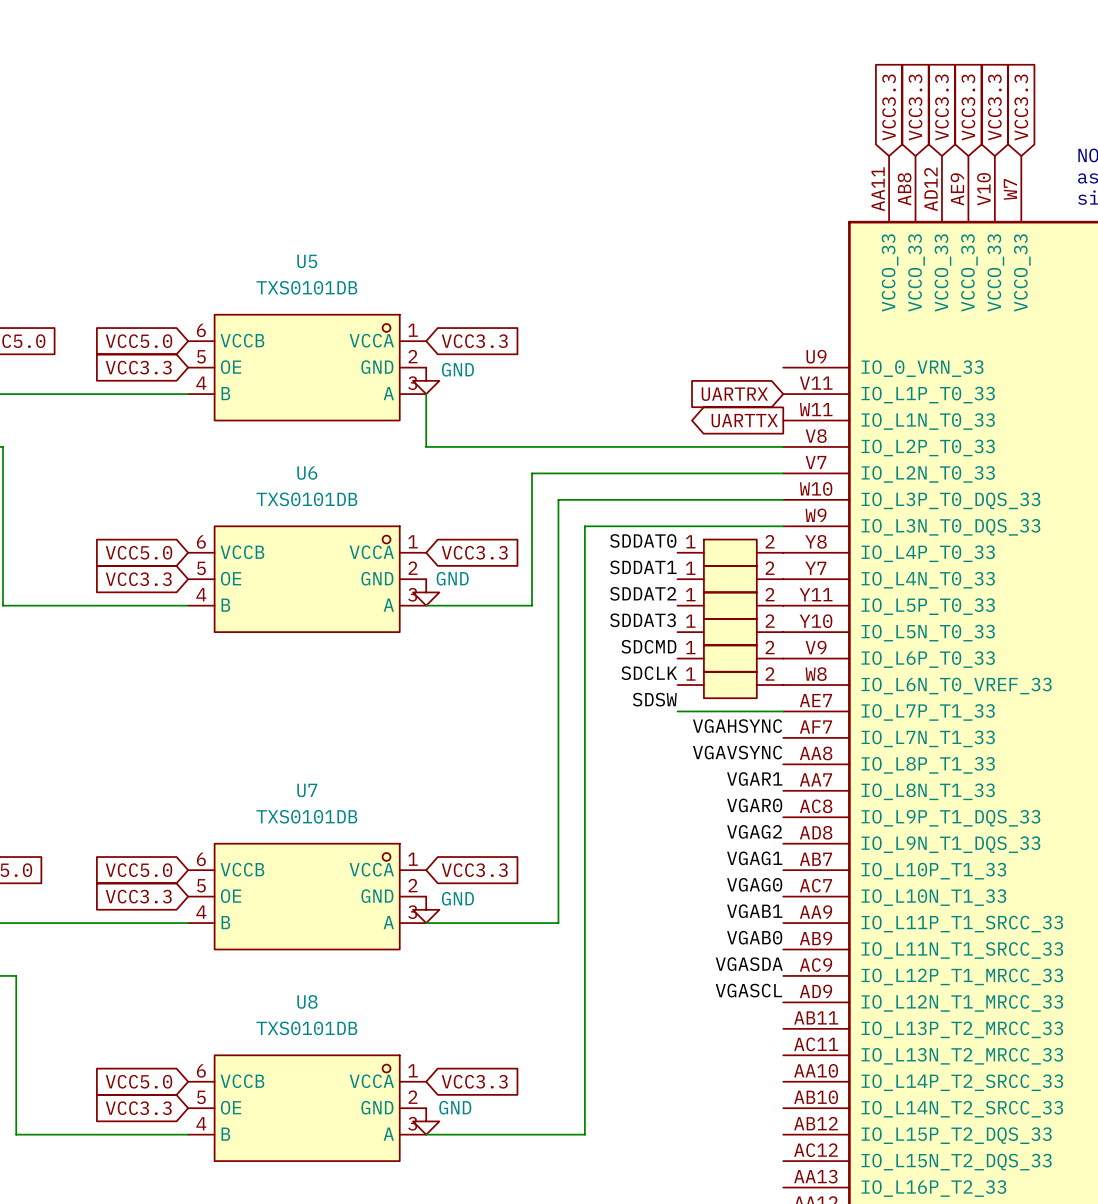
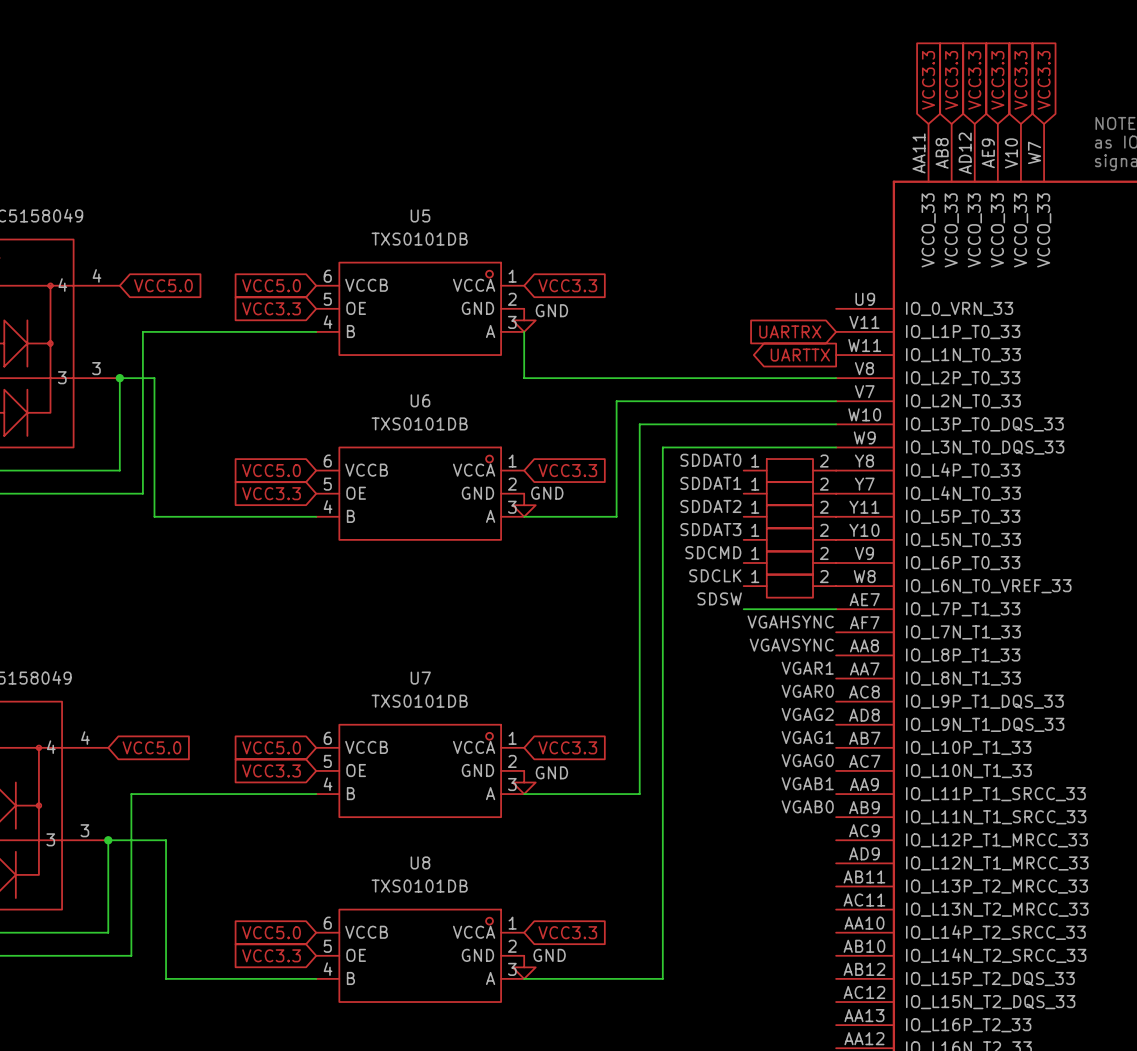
label: VGASDA (749, 964) -> none
label: VGASCL (748, 990) -> none

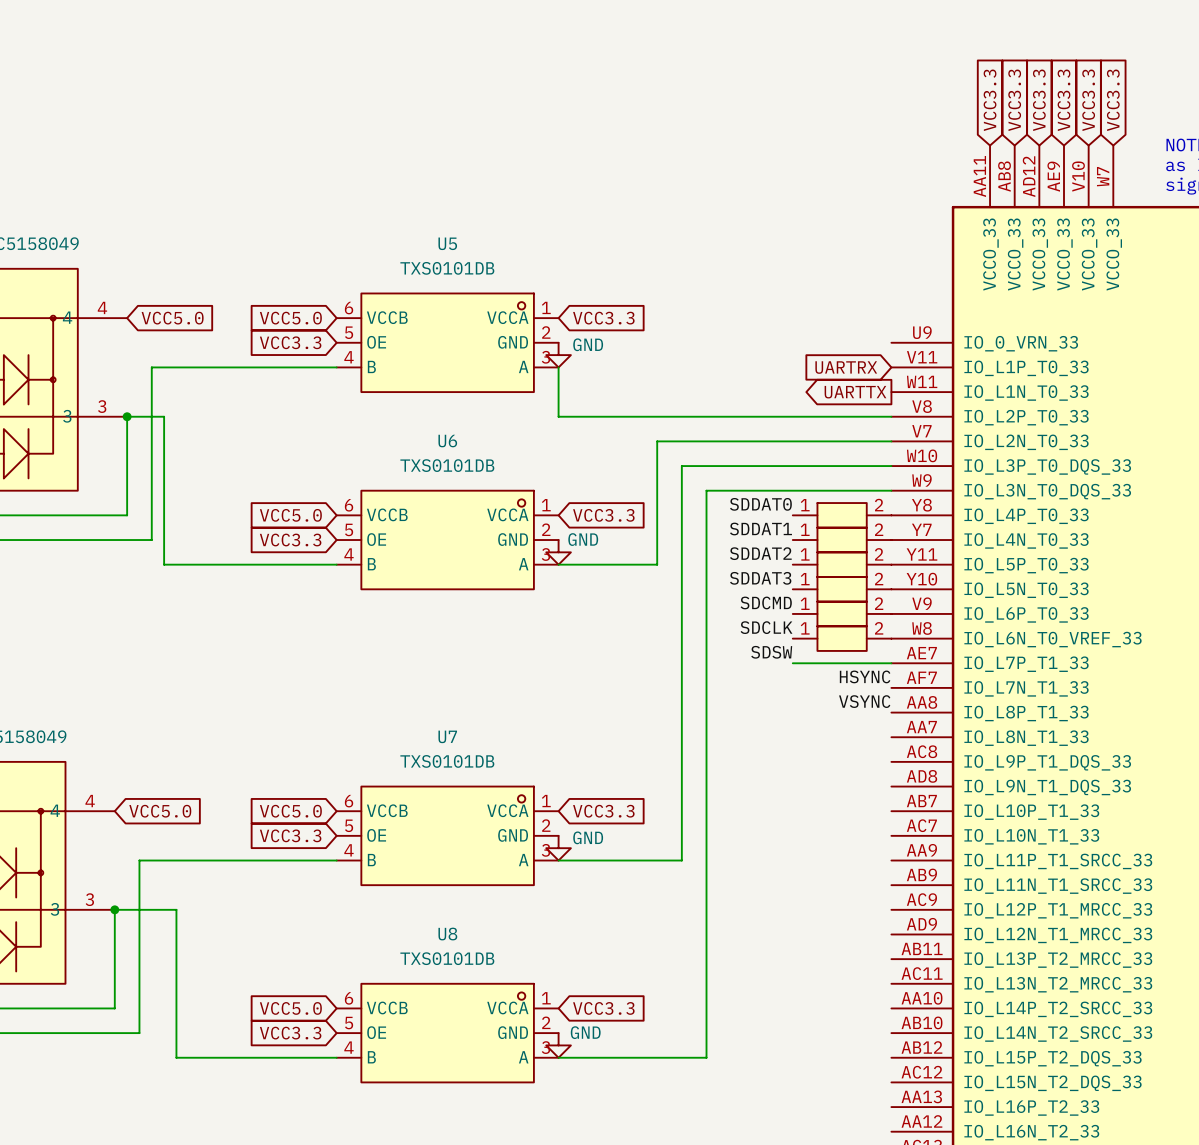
label: VGAHSYNC (790, 622) -> HSYNC (865, 676)
label: VGAVSYNC (791, 645) -> VSYNC (864, 701)
label: VGAR1 (807, 668) -> none
label: VGAR0 (807, 691) -> none
label: VGAG2 (807, 714) -> none
label: VGAG1 (807, 737) -> none
label: VGAG0 (807, 760) -> none
label: VGAB1 (807, 783) -> none
label: VGAB0 (807, 806) -> none

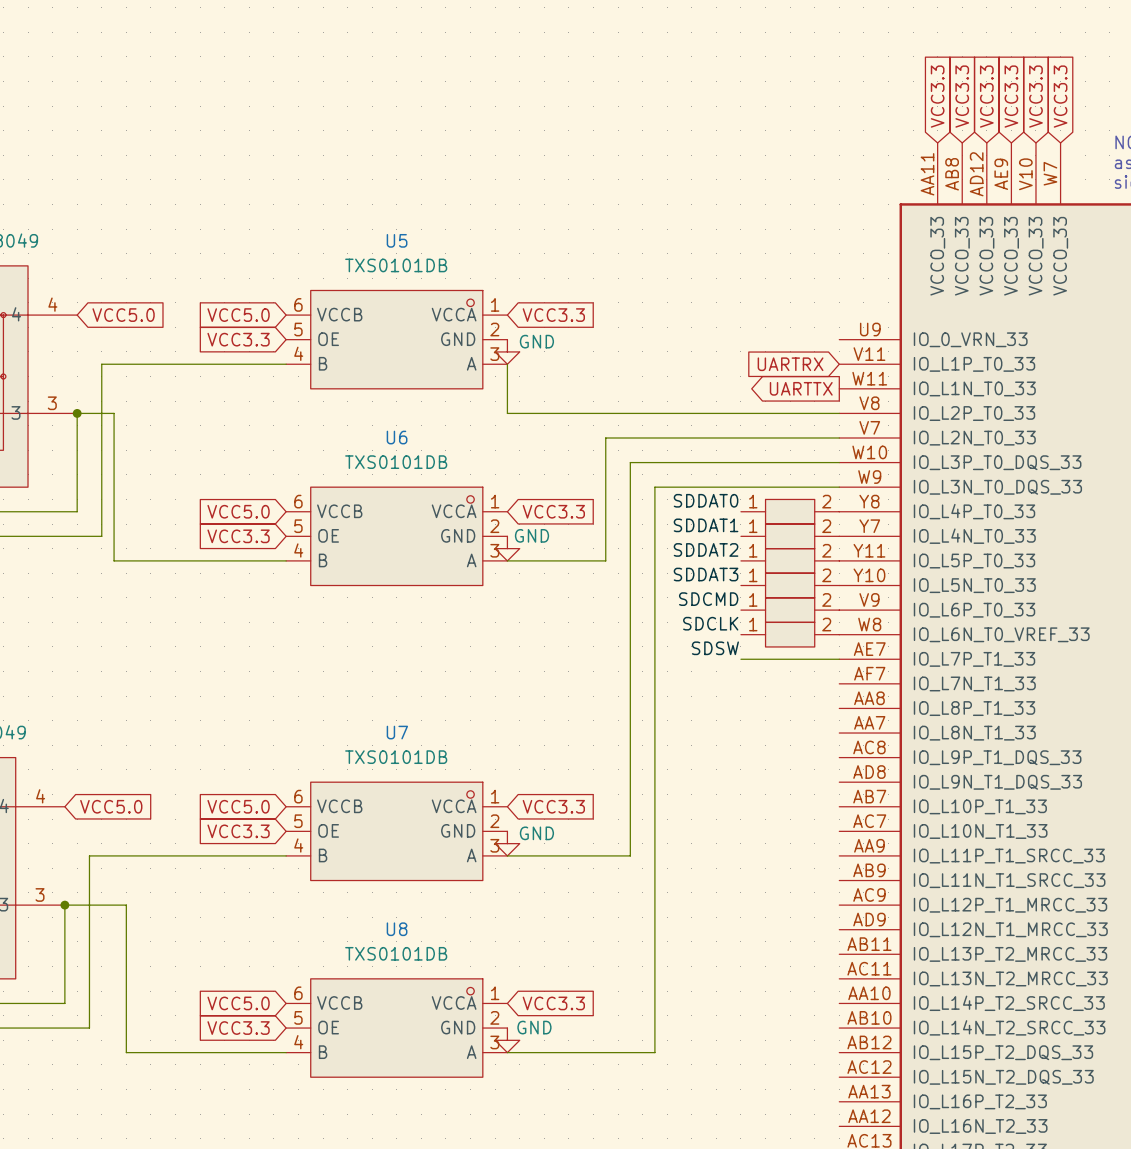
label: HSYNC (865, 676) -> none
label: VSYNC (864, 701) -> none

